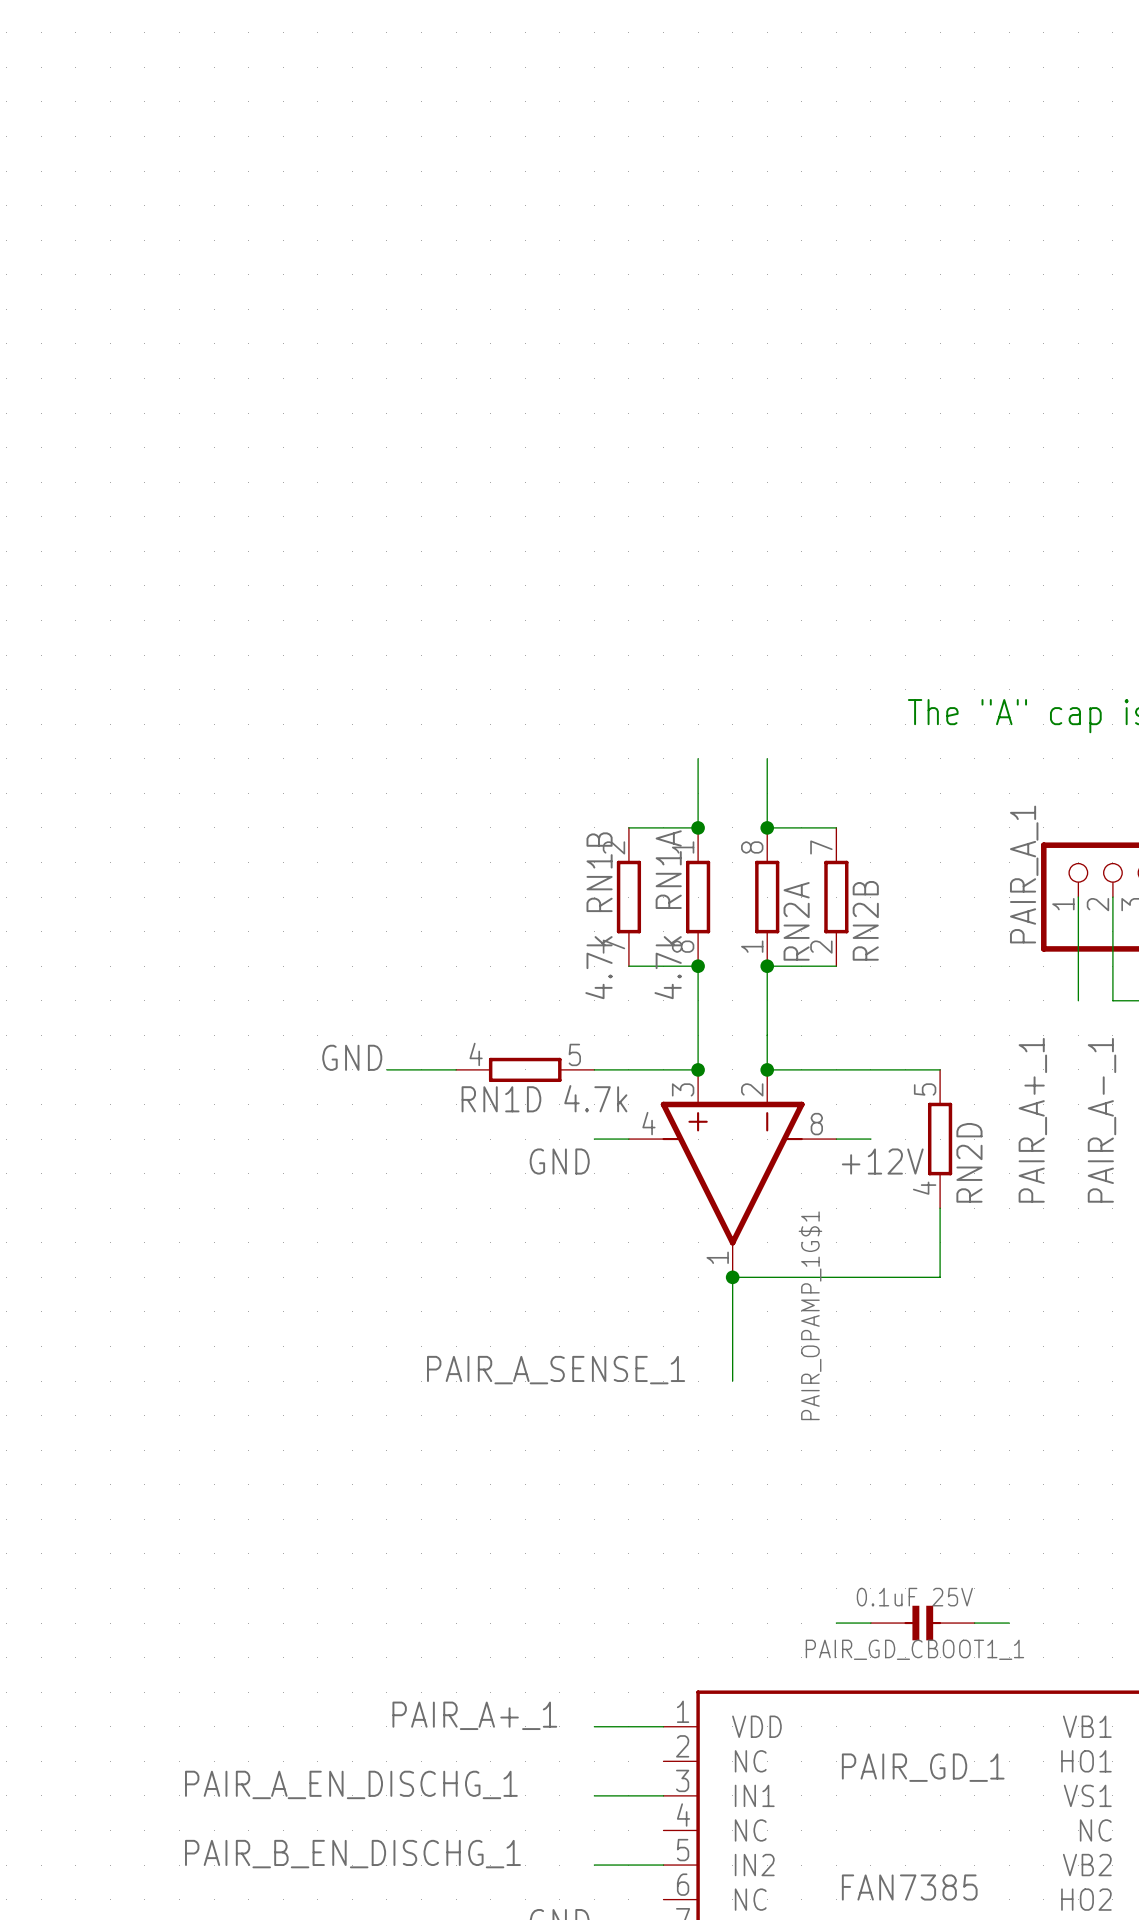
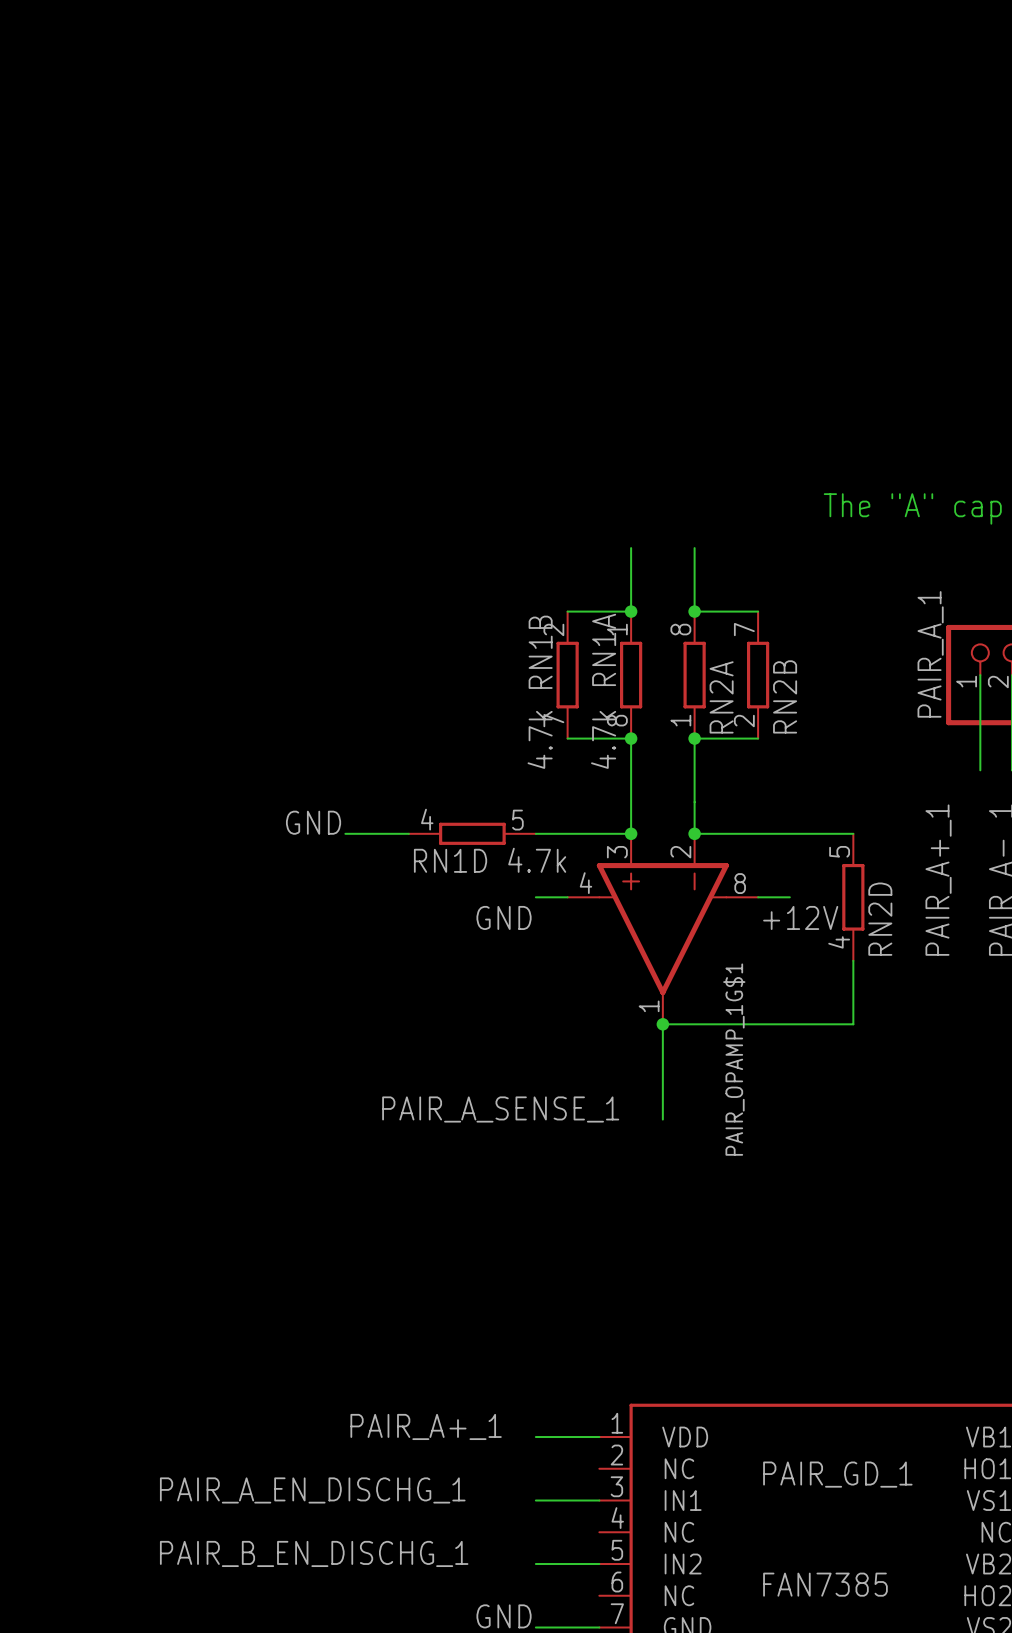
wire: (836, 1623) (870, 1623) -> none
PAIR_GD_CBOOT1_1: 0.1uF 25V (922, 1623) -> none
wire: (974, 1623) (1009, 1623) -> none

